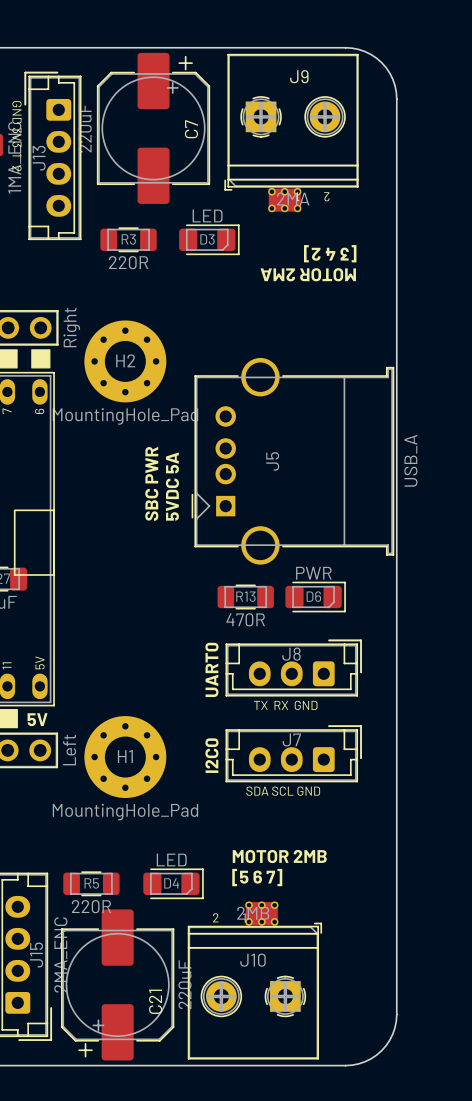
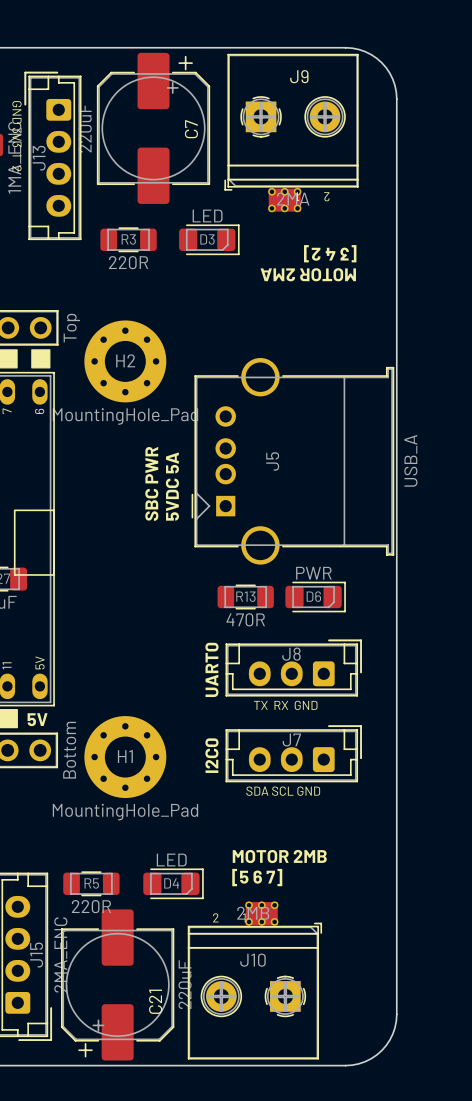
part value: Right (71, 327) -> Top (71, 328)
part value: Left (69, 750) -> Bottom (69, 750)

